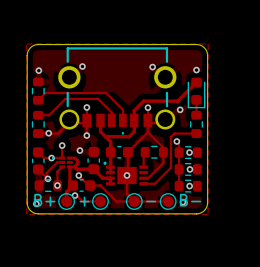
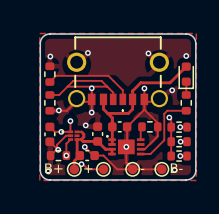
track: none -> (67, 86) (107, 86)

